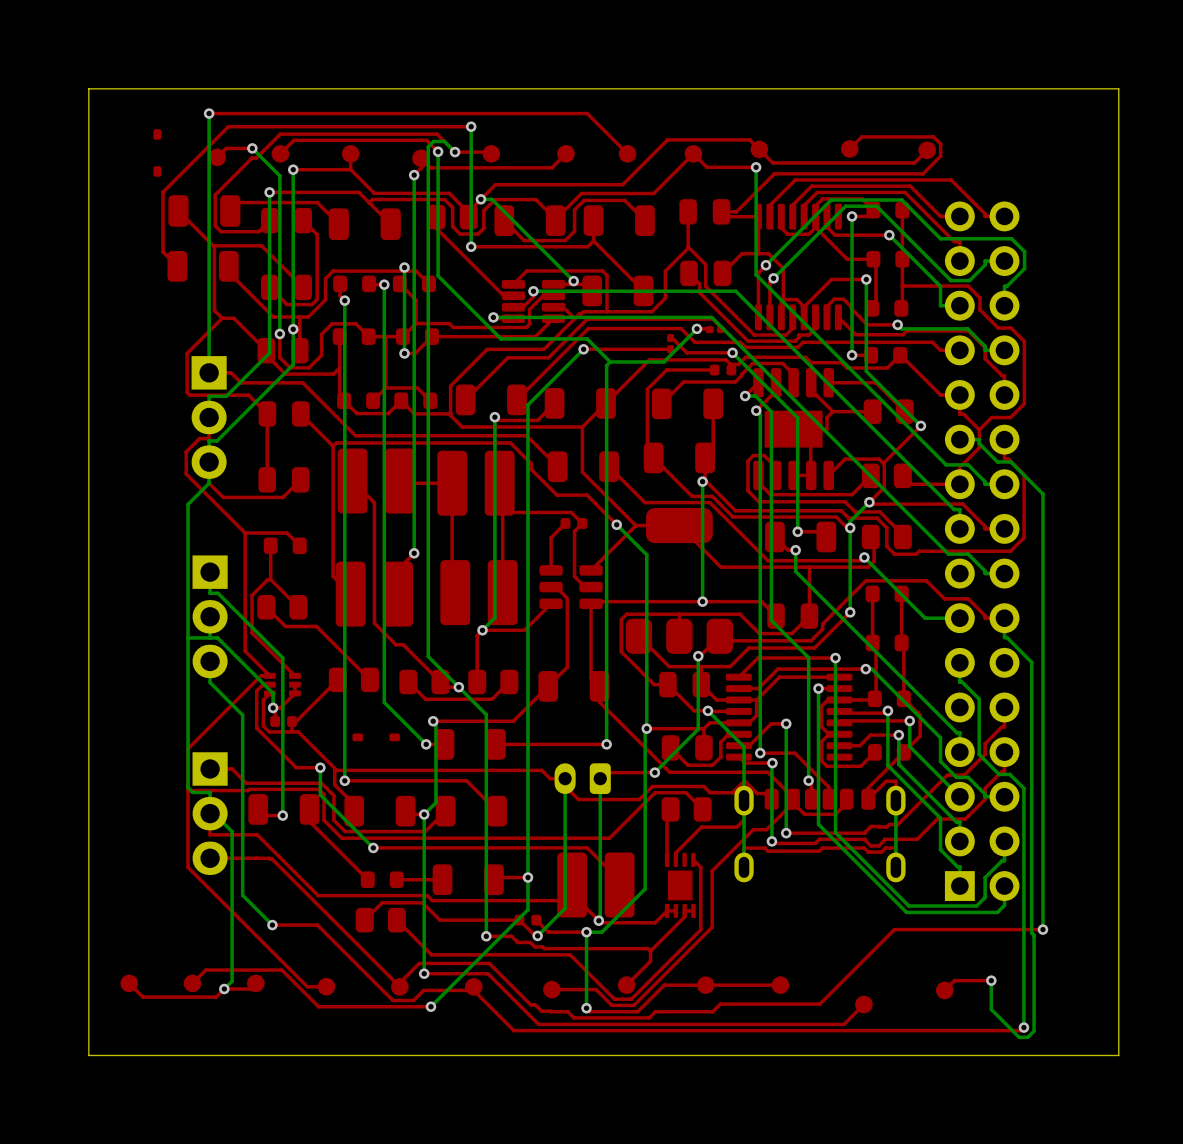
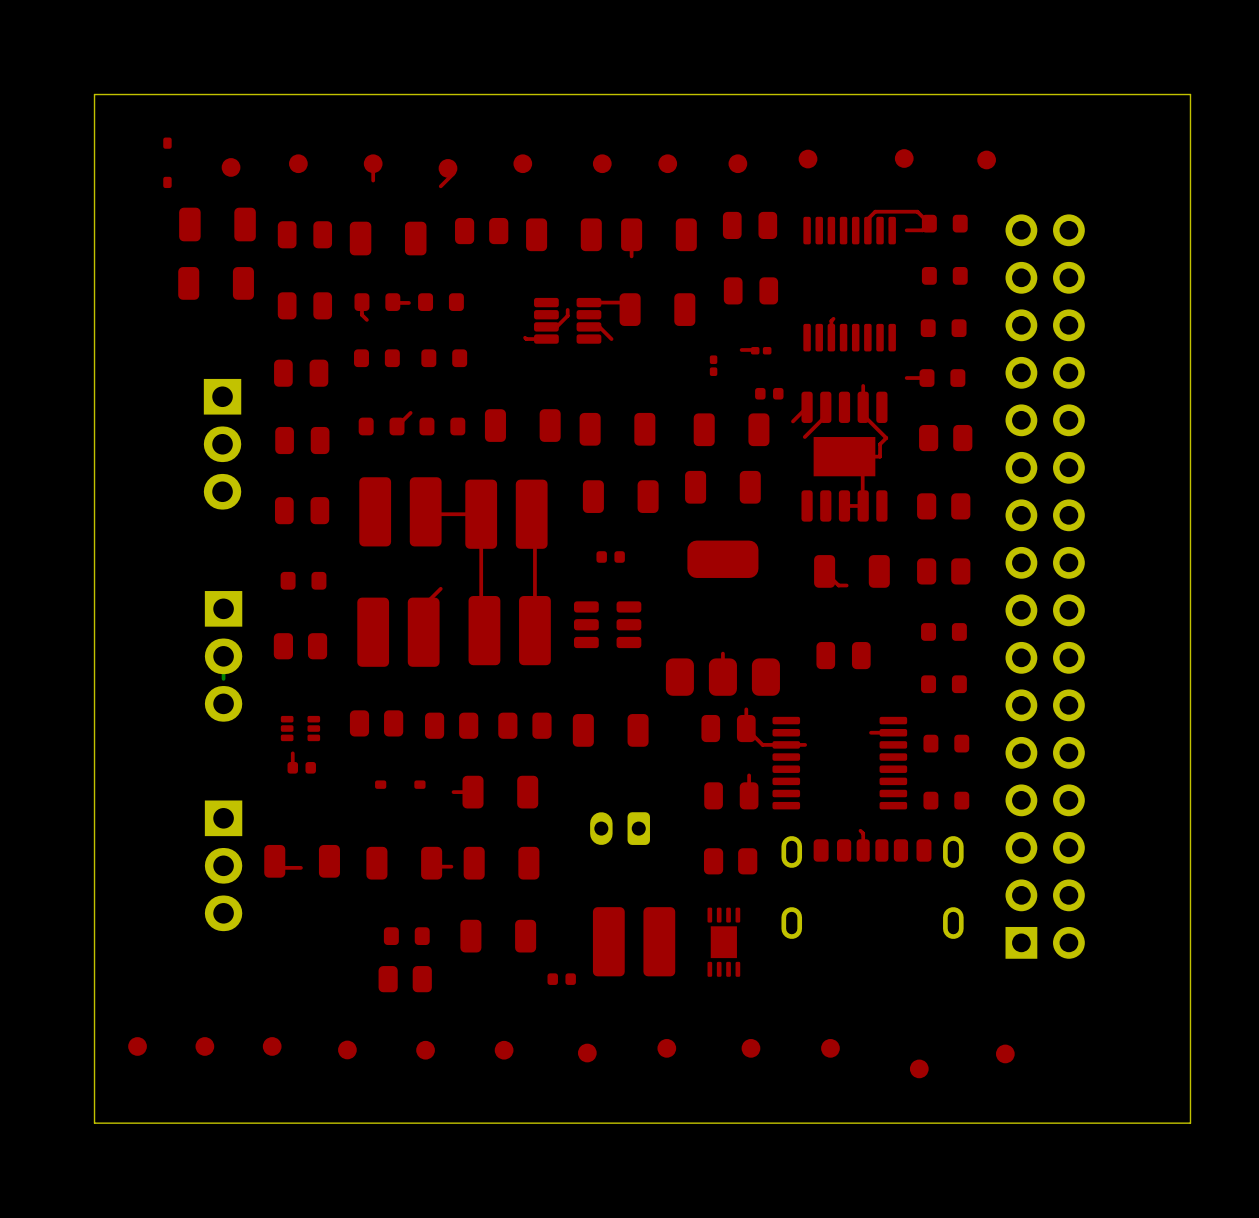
top track: (209, 113) (587, 113) (627, 153) -> none
bottom track: (209, 113) (209, 372) -> none
via: (209, 113) -> none
top track: (471, 126) (228, 126) (163, 192) (163, 252) (177, 266) -> none
bottom track: (471, 126) (471, 246) -> none
via: (471, 126) -> none
top track: (252, 148) (226, 148) (217, 157) -> none
bottom track: (252, 148) (279, 175) (279, 333) -> none
via: (252, 148) -> none
top track: (849, 148) (861, 136) (933, 136) (940, 144) (940, 156) (922, 173) (774, 173) (736, 211) (721, 211) (726, 216) (758, 216) (758, 253) -> none
top track: (927, 150) (914, 162) (772, 162) (749, 139) (667, 139) (622, 184) (495, 184) (468, 211) (468, 217) -> none
top track: (438, 151) (426, 140) (293, 140) (280, 153) -> none
bottom track: (438, 151) (438, 275) (501, 338) (587, 338) (610, 361) -> none
via: (438, 151) -> none
bottom track: (455, 152) (444, 141) (433, 141) (428, 146) (428, 656) (486, 714) (486, 936) -> none
via: (455, 152) -> none
top track: (491, 153) (489, 152) (455, 152) (437, 134) (280, 134) (256, 158) (252, 158) (215, 194) (215, 225) (221, 231) (258, 231) (269, 220) -> none
top track: (566, 153) (551, 167) (430, 167) (421, 158) -> none
top track: (756, 167) (706, 167) (693, 153) (653, 193) (581, 193) (555, 219) -> none
bottom track: (756, 167) (756, 274) (946, 464) (968, 464) (985, 481) (985, 484) (1004, 484) -> none
via: (756, 167) -> none
top track: (293, 169) (350, 169) (374, 193) (449, 193) (468, 212) -> none
bottom track: (293, 169) (293, 364) (217, 440) (209, 440) (209, 483) (188, 504) (188, 787) (192, 792) (210, 792) (210, 813) -> none
via: (293, 169) -> none
bottom track: (414, 175) (414, 553) -> none
via: (414, 175) -> none
top track: (269, 192) (358, 192) (390, 224) -> none
bottom track: (269, 192) (269, 353) (226, 396) (209, 396) (209, 417) -> none
via: (269, 192) -> none
bottom track: (480, 199) (491, 199) (573, 281) -> none
via: (480, 199) -> none
top track: (369, 202) (372, 199) (444, 199) (452, 207) (452, 226) (460, 234) (478, 234) (483, 228) (483, 210) (494, 199) (535, 199) (555, 219) -> none
top track: (178, 210) (213, 245) (261, 245) (303, 287) -> none
top track: (230, 210) (238, 202) (317, 202) (338, 224) -> none
top track: (902, 210) (901, 308) -> none
top track: (688, 211) (688, 246) (705, 264) (705, 286) (754, 335) (786, 335) (792, 328) (792, 317) -> none
top track: (781, 216) (781, 227) (787, 234) (808, 234) (815, 227) (847, 259) (873, 259) (876, 261) (876, 304) (872, 308) -> none
top track: (804, 216) (804, 205) (817, 192) (904, 192) (954, 241) (959, 241) (959, 261) -> none
top track: (826, 216) (826, 227) (835, 235) (889, 235) -> none
bottom track: (852, 216) (852, 355) -> none
via: (852, 216) -> none
top track: (959, 216) (940, 216) (910, 186) (811, 186) (792, 205) (792, 216) -> none
top track: (1004, 216) (985, 216) (985, 214) (951, 180) (795, 180) (769, 205) (769, 216) -> none
top track: (436, 217) (436, 228) (503, 295) (513, 295) -> none
top track: (303, 220) (317, 234) (317, 299) (311, 304) (287, 304) (269, 287) -> none
top track: (644, 220) (624, 200) (584, 200) (574, 209) (574, 231) (565, 240) (524, 240) (504, 220) -> none
bottom track: (889, 235) (940, 286) (940, 305) (959, 305) -> none
via: (889, 235) -> none
top track: (214, 245) (214, 310) (222, 318) -> none
top track: (471, 246) (587, 246) (593, 240) (643, 290) -> none
via: (471, 246) -> none
top track: (688, 247) (665, 271) (665, 298) (651, 311) (583, 311) (543, 349) (487, 349) (450, 385) (450, 415) (462, 426) (582, 426) -> none
bottom track: (1004, 261) (985, 261) (985, 265) (969, 280) (951, 280) (876, 206) (845, 206) (773, 278) -> none
top track: (765, 265) (758, 272) (758, 317) -> none
bottom track: (765, 265) (831, 200) (901, 200) (940, 238) (1011, 238) (1024, 251) (1024, 268) (1006, 286) (1004, 286) (1004, 305) -> none
via: (765, 265) -> none
top track: (228, 266) (228, 272) (273, 316) (308, 316) (325, 299) (325, 278) (333, 271) (416, 271) (428, 283) -> none
bottom track: (404, 267) (404, 353) -> none
via: (404, 267) -> none
top track: (689, 273) (699, 283) (699, 292) (748, 341) (795, 341) (798, 335) (808, 335) (815, 328) (815, 317) -> none
top track: (722, 273) (742, 253) (768, 253) (783, 268) (783, 299) (796, 299) (804, 306) -> none
top track: (773, 278) (769, 282) (769, 317) -> none
via: (773, 278) -> none
top track: (866, 279) (831, 279) (804, 306) -> none
bottom track: (866, 279) (866, 371) (920, 425) -> none
via: (866, 279) -> none
via: (573, 281) -> none
top track: (399, 283) (416, 300) (416, 323) -> none
bottom track: (384, 284) (384, 702) (426, 744) -> none
via: (384, 284) -> none
top track: (513, 284) (526, 270) (602, 270) (607, 275) (607, 311) -> none
top track: (902, 286) (968, 286) (980, 297) (980, 309) (998, 328) (1011, 328) (1024, 341) (1024, 403) (1010, 417) (991, 417) (979, 429) -> none
bottom track: (533, 291) (735, 291) (954, 509) (959, 509) (959, 528) -> none
via: (533, 291) -> none
top track: (553, 295) (543, 295) (529, 309) (529, 324) (526, 327) (453, 327) (449, 323) (416, 323) -> none
bottom track: (344, 300) (344, 780) -> none
via: (344, 300) -> none
top track: (299, 316) (299, 350) -> none
bottom track: (493, 317) (711, 317) (948, 554) (968, 554) (985, 571) (985, 573) (1004, 573) -> none
via: (493, 317) -> none
top track: (826, 317) (826, 306) (834, 299) (843, 299) (867, 324) (897, 324) -> none
top track: (838, 317) (855, 334) (902, 334) (906, 330) (968, 330) (985, 347) (985, 358) (1002, 375) (1004, 375) (1004, 394) -> none
top track: (222, 318) (233, 318) (266, 350) (266, 355) (285, 374) (333, 374) (339, 367) -> none
top track: (222, 318) (187, 353) (187, 392) (189, 395) (248, 395) (267, 413) -> none
top track: (553, 318) (535, 336) (431, 336) (415, 353) (404, 353) -> none
top track: (416, 323) (402, 336) (368, 336) (355, 323) (332, 323) (321, 334) (321, 355) (308, 367) (290, 367) (279, 357) (279, 333) -> none
bottom track: (897, 324) (901, 328) (967, 328) (985, 346) (985, 350) (1004, 350) -> none
via: (897, 324) -> none
bottom track: (696, 328) (663, 361) (610, 361) -> none
via: (696, 328) -> none
via: (293, 329) -> none
top track: (720, 329) (720, 327) (712, 319) (587, 319) (548, 357) (507, 357) (465, 399) -> none
via: (279, 333) -> none
top track: (339, 336) (339, 396) (356, 413) (388, 413) (401, 400) (414, 413) (450, 413) -> none
top track: (385, 336) (385, 388) (417, 388) (430, 400) -> none
top track: (670, 338) (686, 352) (732, 352) -> none
bottom track: (583, 349) (527, 404) (527, 909) (430, 1006) -> none
via: (583, 349) -> none
top track: (670, 349) (583, 349) -> none
top track: (959, 350) (940, 350) (932, 342) (802, 342) (797, 347) (745, 347) (740, 342) (694, 342) (681, 328) (588, 328) (517, 399) -> none
bottom track: (732, 352) (797, 417) (797, 531) -> none
via: (732, 352) -> none
via: (404, 353) -> none
via: (852, 355) -> none
bottom track: (610, 361) (606, 365) (606, 744) -> none
top track: (714, 370) (666, 370) (647, 389) (647, 451) (692, 496) (712, 496) (733, 516) (836, 516) (847, 527) (850, 527) -> none
top track: (209, 372) (231, 372) (241, 382) (302, 382) (355, 435) (526, 435) (557, 466) -> none
top track: (793, 382) (793, 374) (782, 363) (752, 363) (735, 381) (683, 381) (661, 403) -> none
top track: (828, 382) (875, 382) (904, 411) -> none
bottom track: (745, 396) (755, 396) (771, 411) (771, 620) (808, 657) (808, 780) -> none
via: (745, 396) -> none
top track: (554, 403) (537, 420) (498, 420) (494, 417) -> none
top track: (713, 403) (713, 449) (705, 457) (705, 479) (702, 481) (706, 481) (735, 510) (841, 510) (848, 518) (877, 518) (886, 527) (886, 546) (894, 554) (916, 554) (919, 551) (1010, 551) (1024, 537) (1024, 474) (1008, 458) (1004, 458) (1004, 439) -> none
bottom track: (756, 410) (760, 414) (760, 753) -> none
via: (756, 410) -> none
top track: (872, 411) (832, 411) -> none
top track: (300, 413) (333, 446) -> none
top track: (267, 414) (267, 479) -> none
top track: (209, 417) (209, 438) (199, 438) (186, 451) (186, 474) (245, 533) -> none
bottom track: (494, 417) (494, 617) (482, 630) -> none
via: (494, 417) -> none
top track: (920, 425) (883, 463) -> none
via: (920, 425) -> none
top track: (582, 426) (649, 359) (725, 359) (730, 364) (738, 364) (745, 357) (805, 357) (811, 362) (841, 362) (847, 368) (887, 368) (900, 355) (940, 394) (959, 394) (959, 414) (963, 414) (979, 429) -> none
top track: (582, 426) (582, 472) (635, 525) -> none
top track: (979, 429) (979, 447) (962, 464) (959, 464) (959, 484) (911, 484) (902, 475) -> none
bottom track: (959, 439) (979, 439) (979, 443) (997, 461) (1010, 461) (1042, 494) (1042, 929) -> none
top track: (333, 446) (333, 576) (350, 594) -> none
top track: (333, 446) (336, 443) (510, 443) (531, 463) (531, 469) (556, 495) (587, 495) (616, 524) -> none
top track: (209, 462) (209, 483) (223, 497) (283, 497) (300, 479) -> none
top track: (609, 466) (644, 502) (709, 502) (768, 560) (861, 560) (864, 557) -> none
top track: (758, 475) (758, 482) (770, 494) (852, 494) (870, 475) -> none
top track: (776, 475) (776, 467) (764, 455) (753, 455) (748, 460) (748, 490) (758, 501) (844, 501) (855, 511) (879, 511) (902, 537) -> none
top track: (828, 475) (845, 459) (879, 459) (884, 464) (884, 487) (869, 502) -> none
top track: (352, 481) (374, 502) (374, 623) (396, 644) (403, 644) (445, 687) (458, 687) -> none
bottom track: (702, 481) (702, 601) -> none
via: (702, 481) -> none
top track: (869, 502) (871, 504) (962, 504) (985, 526) (985, 528) (1004, 528) -> none
bottom track: (869, 502) (850, 521) (850, 612) -> none
via: (869, 502) -> none
top track: (502, 512) (571, 512) (582, 523) (574, 531) (574, 576) (585, 587) (591, 587) -> none
top track: (565, 523) (551, 537) (551, 570) -> none
bottom track: (616, 524) (646, 554) (645, 888) (601, 932) (586, 932) (586, 1008) -> none
via: (616, 524) -> none
top track: (635, 525) (679, 525) (720, 567) (868, 567) (874, 561) (874, 540) (870, 537) -> none
top track: (635, 525) (591, 570) -> none
via: (850, 527) -> none
top track: (797, 531) (821, 531) (826, 537) -> none
via: (797, 531) -> none
top track: (245, 533) (286, 533) (299, 545) -> none
top track: (245, 533) (245, 651) (269, 675) (260, 675) (188, 748) (188, 867) (307, 986) (326, 986) -> none
top track: (270, 545) (270, 579) -> none
bottom track: (795, 550) (795, 571) (956, 732) (959, 732) (959, 752) -> none
via: (795, 550) -> none
via: (414, 553) -> none
bottom track: (864, 557) (925, 618) (959, 618) -> none
via: (864, 557) -> none
top track: (809, 567) (809, 616) (791, 633) (759, 633) (740, 614) (626, 614) (621, 619) (621, 651) (654, 684) (667, 684) (694, 710) (738, 711) -> none
bottom track: (210, 572) (210, 593) (218, 593) (282, 658) (282, 815) -> none
top track: (270, 579) (298, 607) -> none
top track: (270, 579) (267, 579) (252, 595) (252, 633) (294, 675) -> none
top track: (551, 587) (556, 587) (567, 598) (567, 667) (513, 721) (433, 721) -> none
top track: (872, 593) (872, 642) (876, 646) (876, 697) (873, 700) (827, 700) (821, 706) (821, 726) (829, 734) -> none
top track: (901, 593) (903, 698) (920, 715) (920, 736) (868, 787) (868, 799) (886, 781) (895, 781) (895, 800) -> none
via: (702, 601) -> none
top track: (551, 603) (524, 630) (482, 630) (477, 635) (477, 681) -> none
top track: (266, 607) (285, 626) (316, 626) (369, 679) -> none
top track: (850, 612) (814, 648) (748, 648) (730, 666) (669, 666) (638, 636) -> none
via: (850, 612) -> none
top track: (776, 616) (761, 601) (593, 601) (591, 603) (591, 677) (599, 686) (599, 702) (669, 772) (767, 772) (793, 797) (793, 803) -> none
top track: (1004, 618) (985, 618) (985, 615) (968, 598) (944, 598) (926, 580) (865, 580) (822, 624) (822, 629) (811, 640) (724, 640) (719, 636) (698, 656) -> none
bottom track: (1004, 618) (1004, 637) (1006, 637) (1031, 662) (1031, 933) (1034, 935) (1034, 1031) (1027, 1037) (1019, 1037) (991, 1009) (991, 980) -> none
via: (482, 630) -> none
bottom track: (188, 637) (217, 637) (273, 693) (273, 707) -> none
bottom track: (698, 656) (698, 729) (654, 772) -> none
via: (698, 656) -> none
top track: (835, 658) (758, 658) (738, 677) -> none
bottom track: (835, 658) (835, 832) (908, 905) (976, 905) (985, 897) (985, 877) (1002, 860) (1004, 860) (1004, 841) -> none
via: (835, 658) -> none
bottom track: (210, 661) (210, 682) (242, 715) (242, 895) (272, 925) -> none
bottom track: (959, 662) (959, 682) (962, 682) (979, 699) (979, 754) (999, 774) (1009, 774) (1023, 788) (1023, 1027) -> none
top track: (865, 669) (777, 669) (758, 688) (738, 688) -> none
bottom track: (865, 669) (871, 669) (940, 737) (940, 761) (956, 777) (968, 777) (985, 794) (985, 796) (1004, 796) -> none
via: (865, 669) -> none
top track: (839, 677) (779, 677) (756, 700) (756, 715) (749, 722) (709, 722) (703, 728) (646, 728) -> none
top track: (337, 679) (296, 721) (291, 721) (291, 731) -> none
top track: (509, 681) (492, 699) (425, 699) (408, 681) -> none
top track: (269, 684) (263, 684) (256, 690) (256, 728) (296, 767) (320, 767) -> none
top track: (294, 684) (294, 693) (280, 707) (273, 707) -> none
via: (458, 687) -> none
bottom track: (818, 688) (818, 824) (906, 912) (997, 912) (1004, 905) (1004, 886) -> none
via: (818, 688) -> none
top track: (269, 693) (263, 699) (263, 726) (269, 731) (298, 731) (334, 768) (334, 784) (354, 804) (354, 811) -> none
via: (273, 707) -> none
top track: (1004, 707) (1004, 726) (1002, 726) (985, 743) (985, 754) (964, 775) (947, 775) (896, 826) (889, 824) (886, 826) (870, 826) (865, 833) (786, 833) -> none
bottom track: (707, 710) (744, 746) (744, 867) -> none
via: (707, 710) -> none
top track: (887, 710) (885, 713) (841, 713) (839, 711) -> none
bottom track: (887, 710) (887, 765) (940, 818) (940, 849) (957, 866) (959, 866) (959, 886) -> none
via: (887, 710) -> none
top track: (909, 720) (841, 720) (839, 722) -> none
bottom track: (909, 720) (909, 746) (959, 796) -> none
via: (909, 720) -> none
bottom track: (433, 721) (435, 724) (435, 802) (424, 814) (424, 973) -> none
via: (433, 721) -> none
top track: (786, 723) (771, 723) (749, 745) (738, 745) -> none
bottom track: (786, 723) (786, 833) -> none
via: (786, 723) -> none
via: (646, 728) -> none
top track: (738, 734) (728, 734) (720, 742) (720, 756) (712, 765) (687, 765) (670, 747) -> none
top track: (829, 734) (821, 741) (821, 761) (826, 766) (860, 766) (874, 752) -> none
top track: (898, 735) (870, 735) (859, 745) (839, 745) -> none
bottom track: (898, 735) (898, 764) (956, 822) (959, 822) (959, 841) -> none
via: (898, 735) -> none
via: (426, 744) -> none
top track: (606, 744) (495, 744) -> none
via: (606, 744) -> none
top track: (1004, 752) (1004, 771) (1002, 771) (985, 788) (985, 799) (965, 819) (937, 819) (917, 839) (884, 839) (878, 845) (870, 845) (865, 839) (819, 839) (815, 843) (773, 843) (771, 841) -> none
top track: (760, 753) (794, 753) (828, 787) (828, 799) -> none
via: (760, 753) -> none
top track: (738, 757) (744, 763) (772, 763) -> none
bottom track: (772, 763) (771, 841) -> none
via: (772, 763) -> none
bottom track: (320, 767) (320, 794) (373, 847) -> none
via: (320, 767) -> none
top track: (210, 768) (232, 768) (246, 783) (321, 783) (333, 795) (333, 820) (345, 831) (425, 831) (445, 811) -> none
top track: (334, 770) (541, 770) (550, 778) (565, 778) -> none
top track: (654, 772) (606, 772) (600, 778) -> none
via: (654, 772) -> none
top track: (557, 778) (578, 799) (639, 799) (652, 786) (703, 786) (710, 792) (732, 792) (744, 781) -> none
bottom track: (565, 778) (565, 908) (537, 935) -> none
bottom track: (600, 778) (598, 920) -> none
top track: (344, 780) (466, 780) (497, 811) -> none
via: (344, 780) -> none
via: (808, 780) -> none
top track: (744, 781) (757, 793) (765, 793) (771, 799) -> none
top track: (744, 781) (744, 819) (736, 827) (701, 827) (675, 852) (675, 859) -> none
top track: (188, 790) (318, 789) (323, 794) (323, 820) (341, 838) (609, 838) (655, 792) (685, 792) (702, 809) -> none
top track: (846, 799) (846, 803) (835, 814) (804, 814) (793, 803) -> none
bottom track: (895, 800) (895, 867) -> none
top track: (793, 803) (766, 829) (753, 829) (712, 870) (712, 927) (633, 1005) (611, 1005) (596, 989) (551, 989) -> none
bottom track: (210, 809) (232, 831) (232, 981) (224, 989) -> none
top track: (309, 809) (309, 821) (367, 879) -> none
top track: (670, 809) (667, 812) (667, 859) -> none
top track: (210, 813) (210, 834) (257, 834) (318, 895) (427, 895) (432, 900) (578, 900) (600, 922) (655, 922) (667, 910) (675, 910) -> none
via: (424, 814) -> none
via: (282, 815) -> none
via: (786, 833) -> none
via: (771, 841) -> none
top track: (373, 847) (587, 847) (619, 880) (619, 884) -> none
via: (373, 847) -> none
top track: (210, 858) (271, 858) (399, 986) -> none
top track: (693, 859) (700, 867) (700, 929) (631, 999) (614, 999) (570, 954) (431, 954) (396, 920) -> none
top track: (895, 867) (895, 848) (885, 848) (881, 852) (868, 852) (864, 848) (822, 848) (819, 851) (767, 851) (764, 848) (744, 848) (744, 867) -> none
top track: (527, 877) (496, 877) (493, 879) -> none
via: (527, 877) -> none
top track: (442, 879) (396, 879) -> none
top track: (693, 910) (684, 910) (684, 917) (650, 951) -> none
top track: (364, 920) (382, 902) (422, 902) (439, 920) (519, 920) (535, 935) (537, 935) -> none
top track: (536, 920) (548, 932) (586, 932) -> none
via: (598, 920) -> none
top track: (272, 925) (317, 925) (392, 1000) (413, 1000) (423, 990) (473, 990) -> none
via: (272, 925) -> none
top track: (1042, 929) (894, 929) (819, 1004) (720, 1004) (712, 1011) (655, 1011) (649, 1017) (574, 1017) (567, 1011) (541, 1011) (535, 1005) (530, 1005) (489, 963) (419, 963) (397, 984) -> none
via: (1042, 929) -> none
via: (586, 932) -> none
via: (537, 935) -> none
top track: (486, 936) (511, 936) (517, 942) (530, 942) (535, 947) (544, 948) (648, 948) (650, 951) -> none
via: (486, 936) -> none
top track: (650, 951) (650, 961) (626, 985) -> none
top track: (424, 973) (487, 973) (538, 1024) (843, 1024) (863, 1004) -> none
via: (424, 973) -> none
top track: (991, 980) (954, 980) (944, 990) -> none
via: (991, 980) -> none
top track: (192, 983) (205, 970) (281, 970) (318, 1006) (430, 1006) -> none
top track: (255, 983) (250, 989) (224, 989) (216, 997) (142, 997) (129, 983) -> none
top track: (780, 985) (664, 985) (637, 1011) (590, 1011) (586, 1008) -> none
via: (224, 989) -> none
top track: (473, 990) (513, 1030) (1020, 1030) (1023, 1027) -> none
via: (430, 1006) -> none
via: (586, 1008) -> none
via: (1023, 1027) -> none

